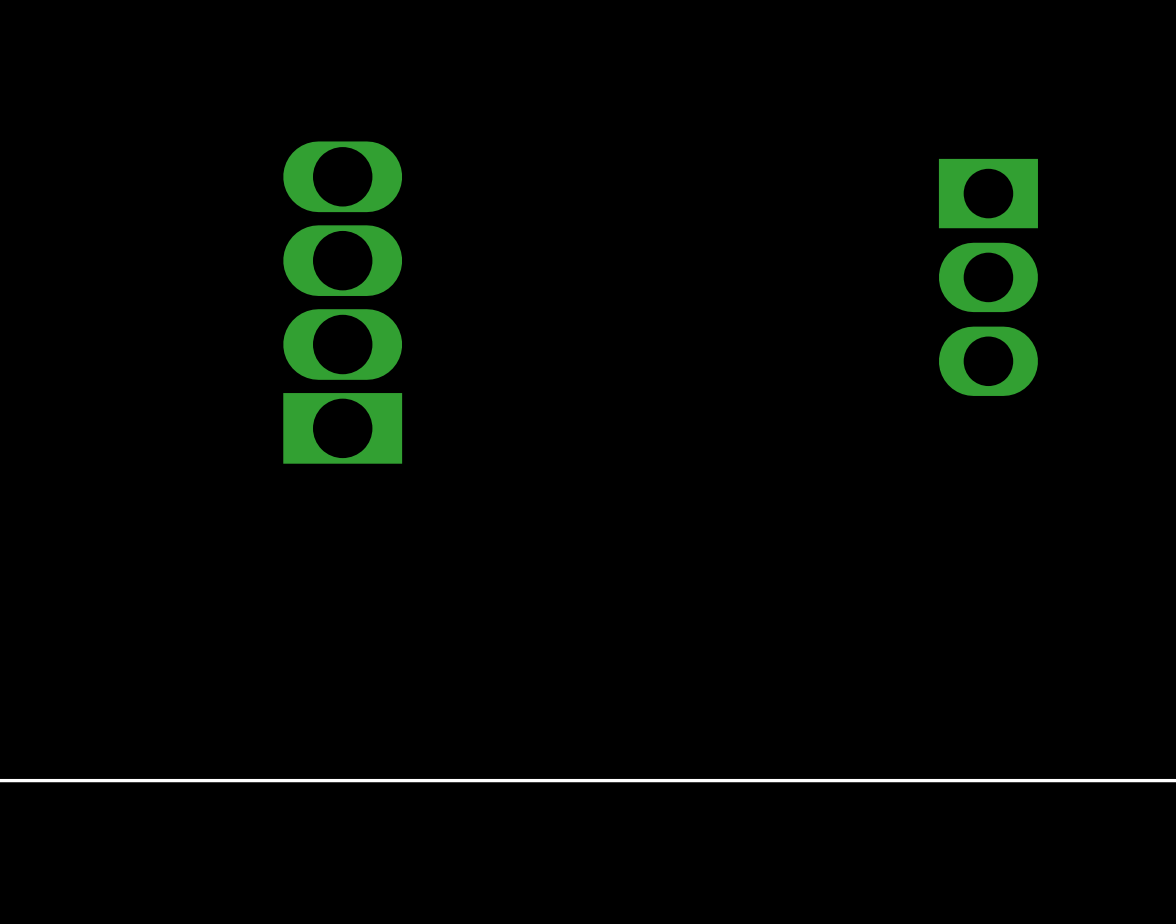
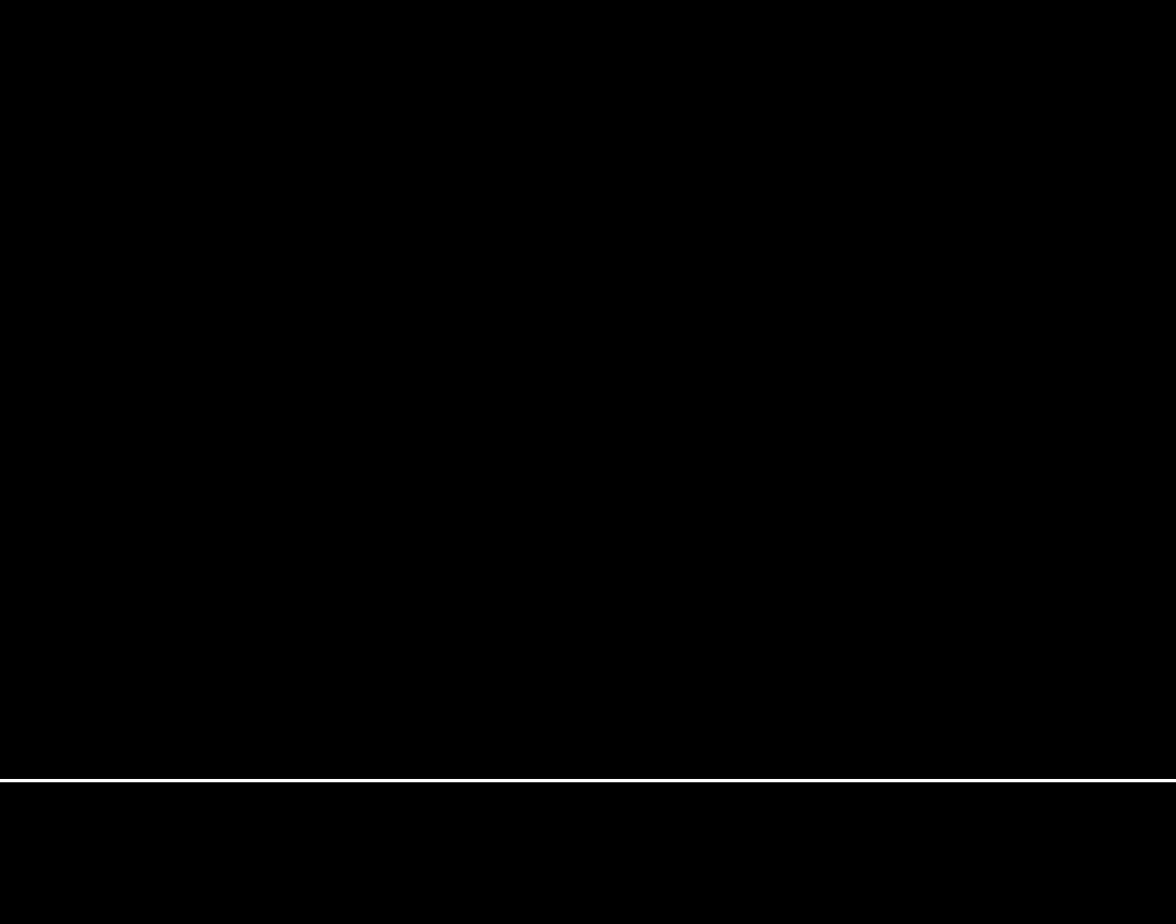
part: (988, 277) -> none
part: (342, 302) -> none

